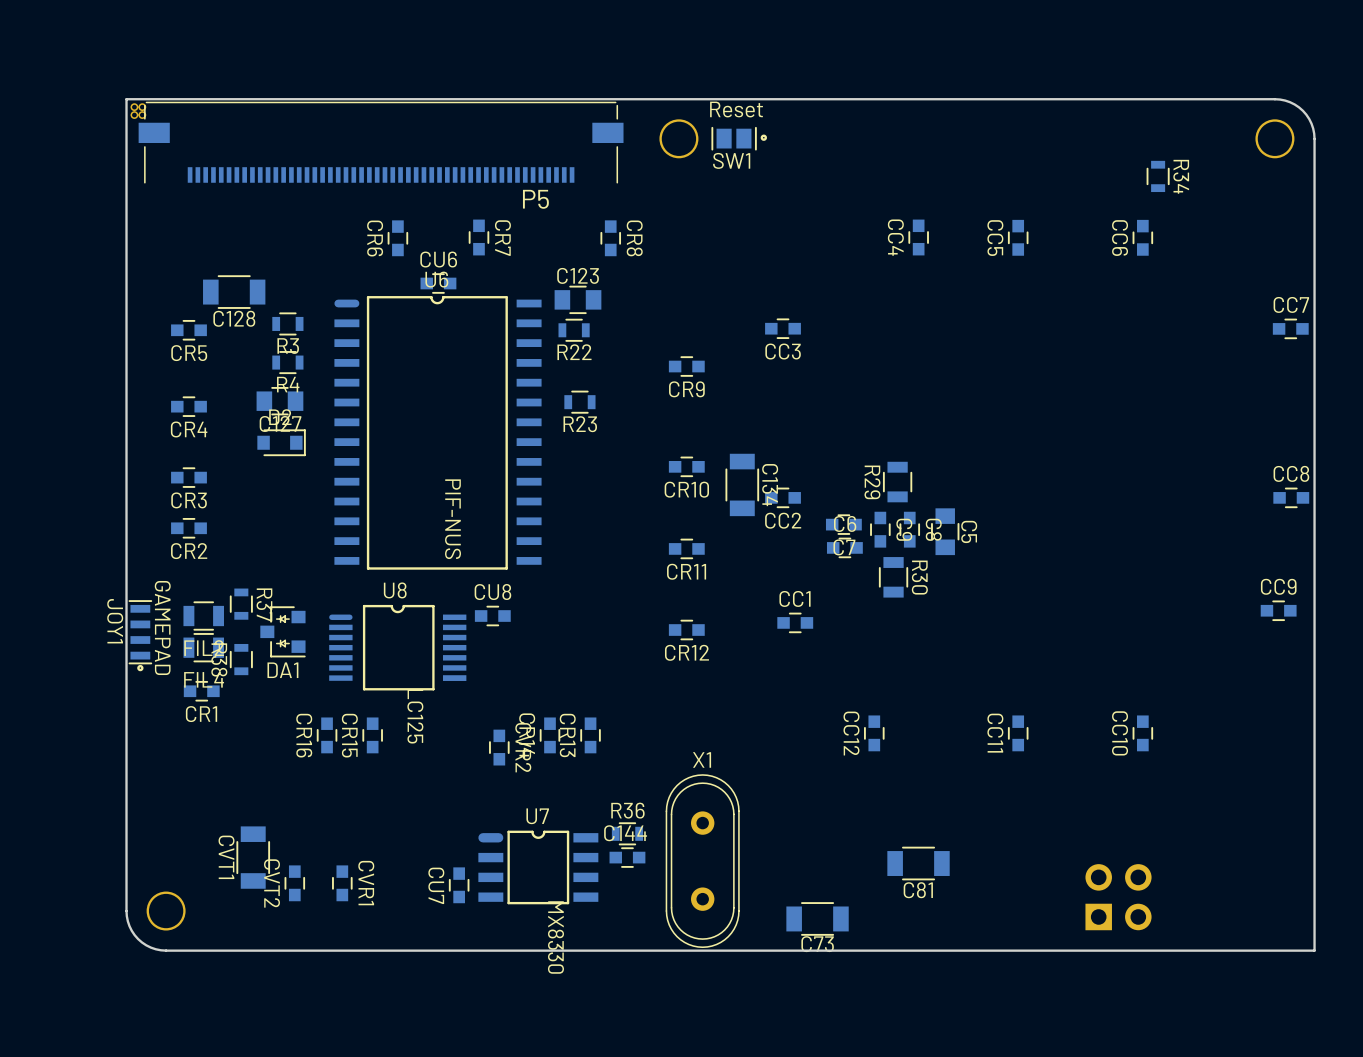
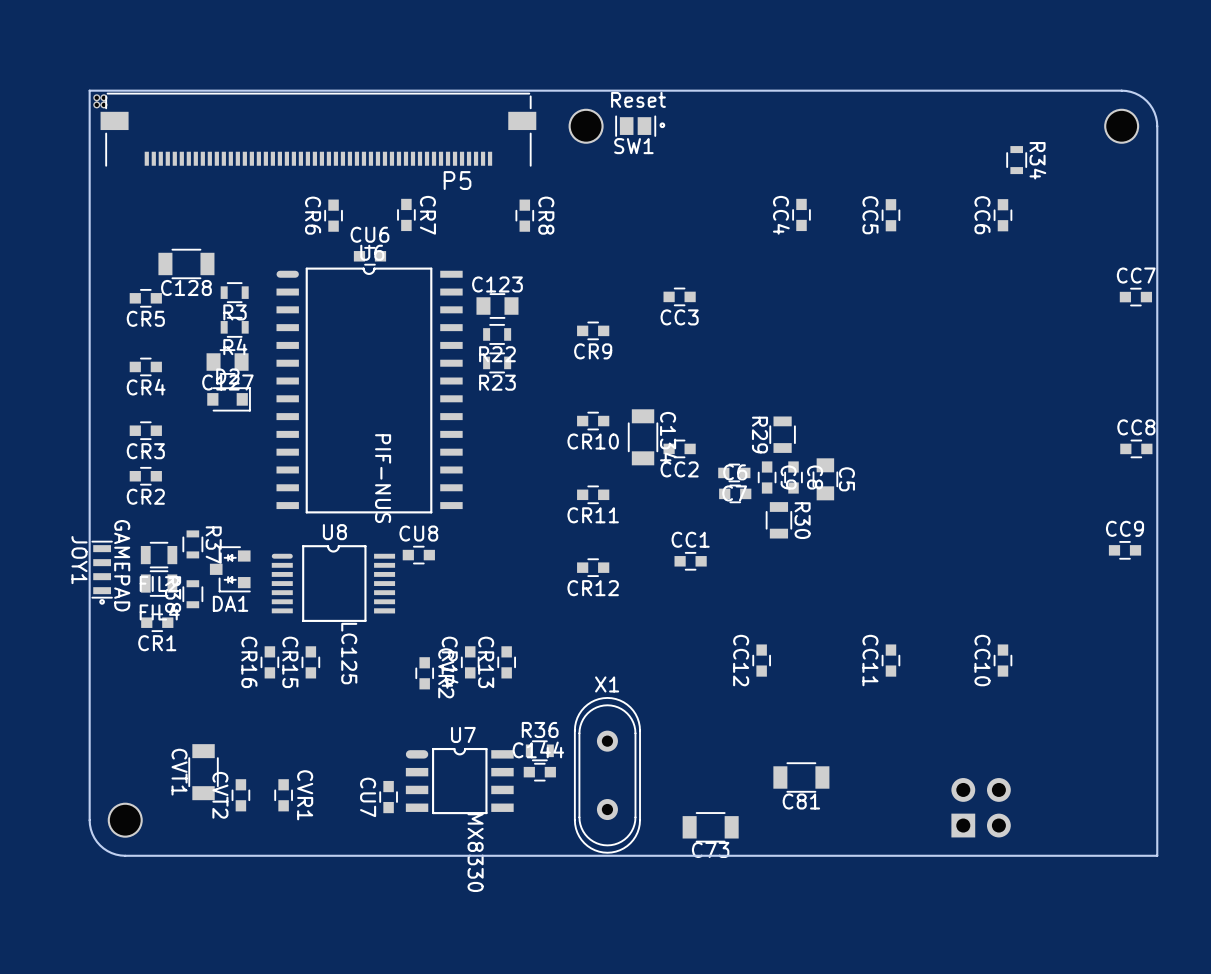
C123 position: (577, 299) -> (497, 306)
R22 position: (574, 330) -> (497, 334)

